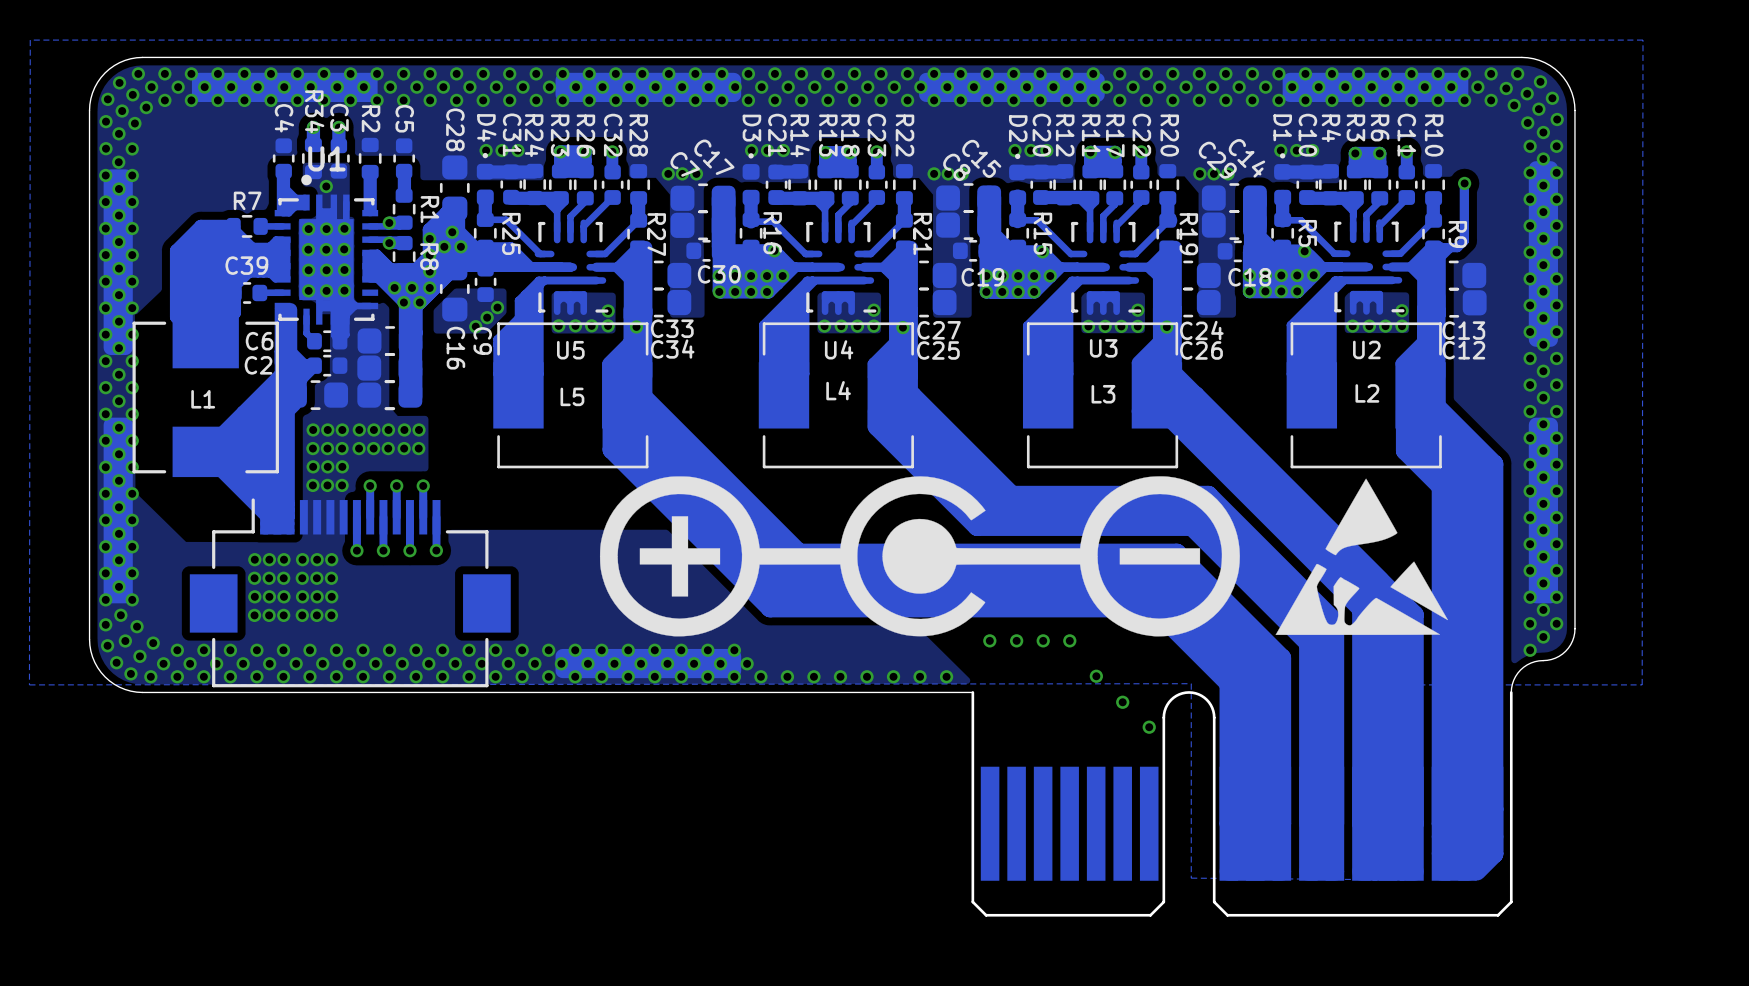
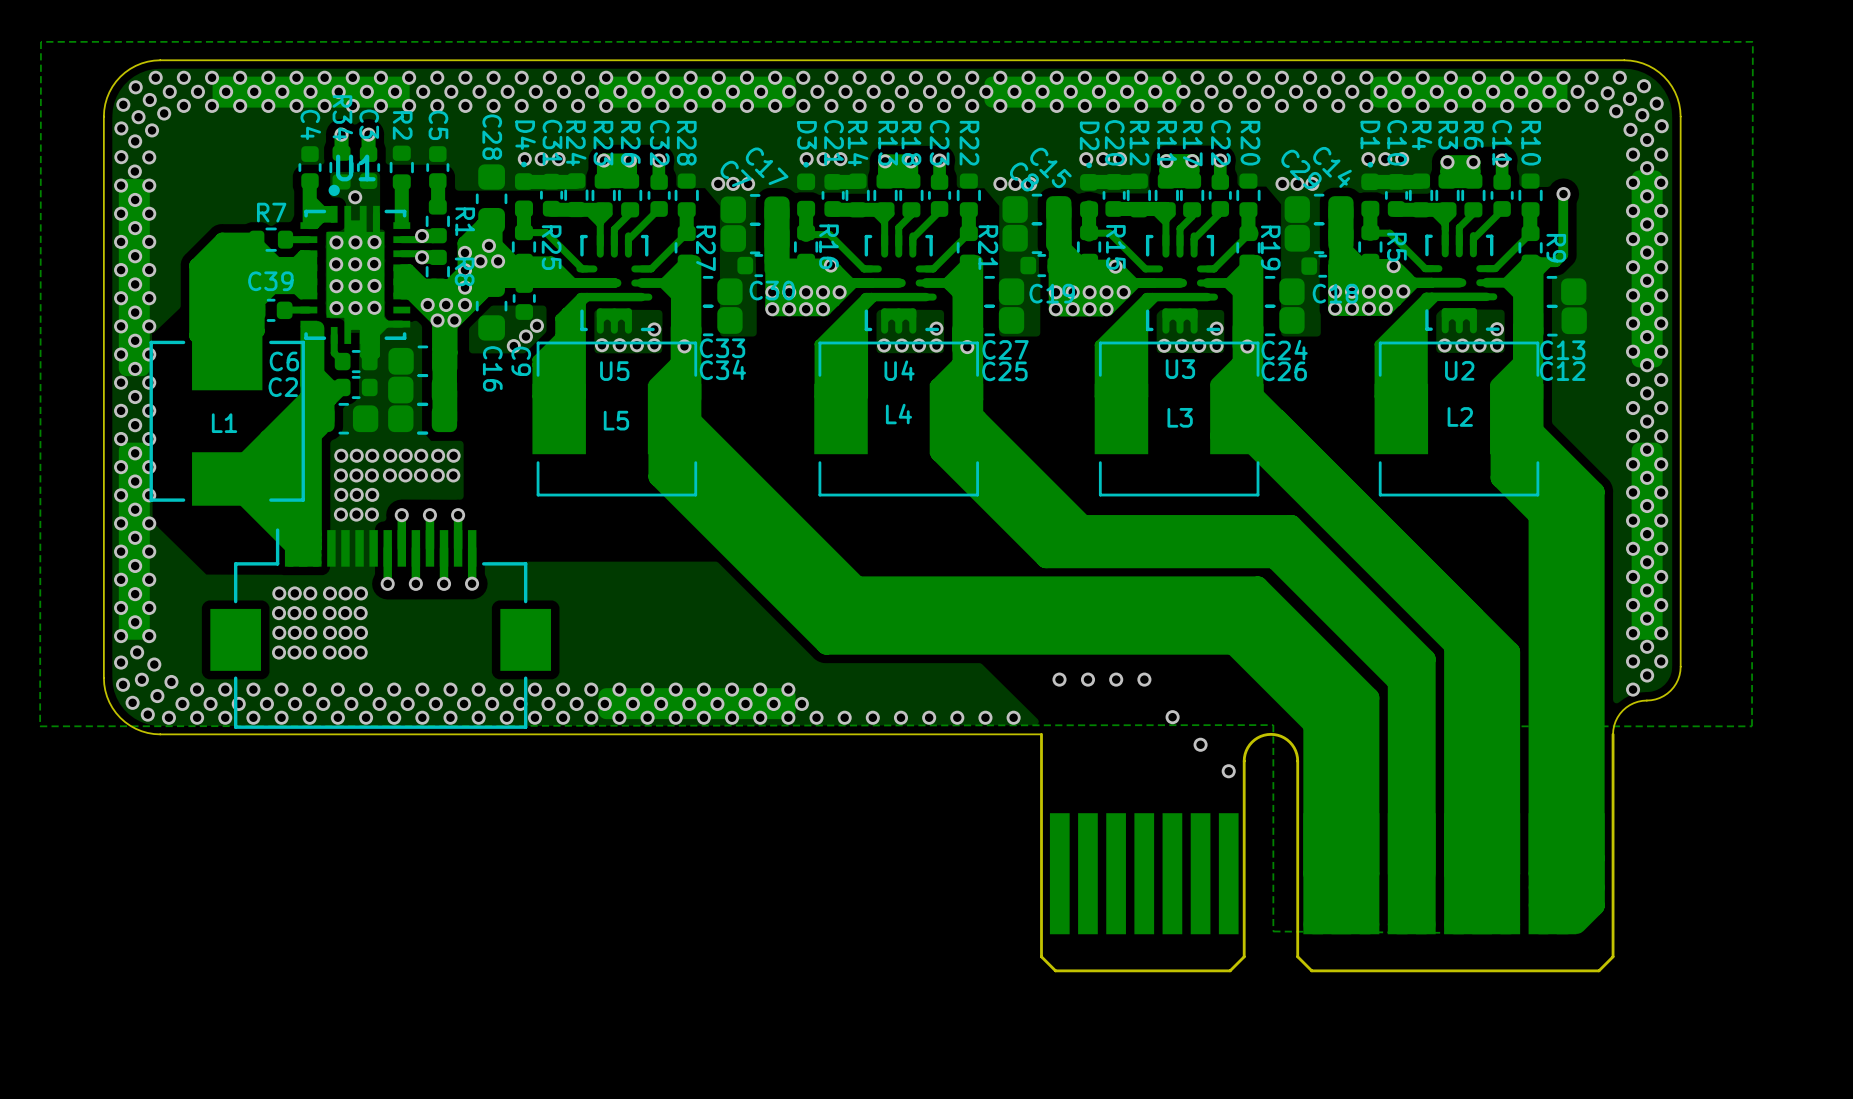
drawing: [599, 476, 1240, 637] -> none
drawing: [1275, 478, 1448, 635] -> none

